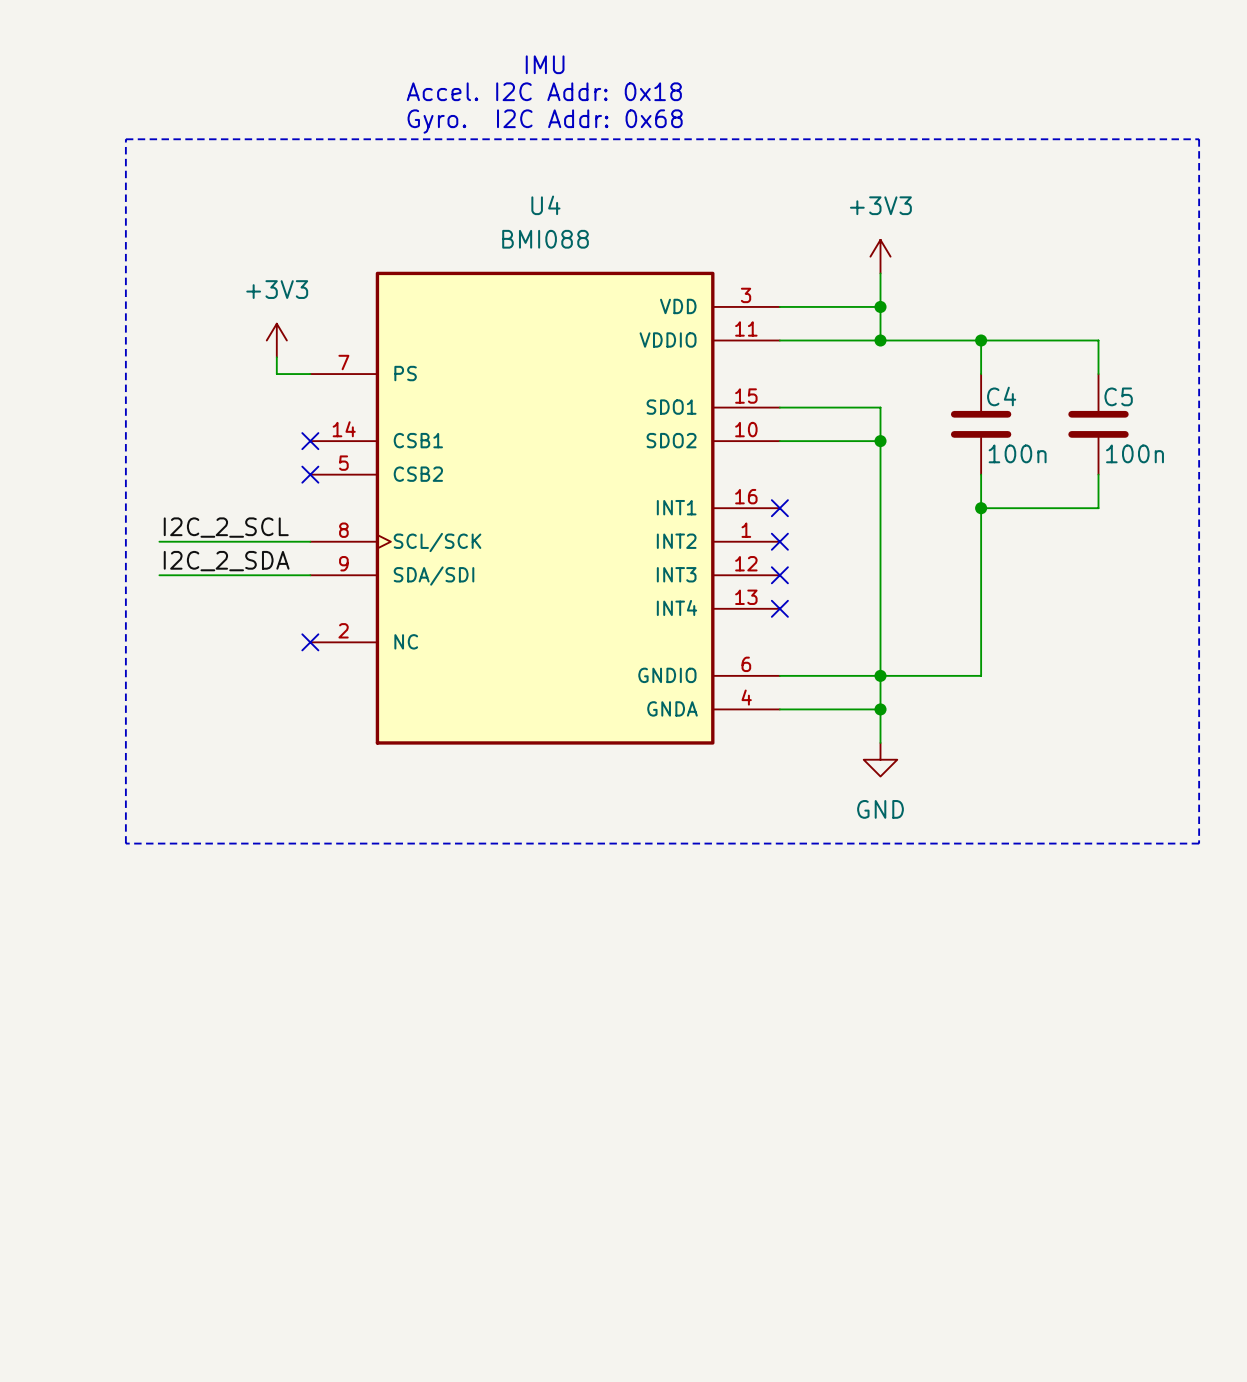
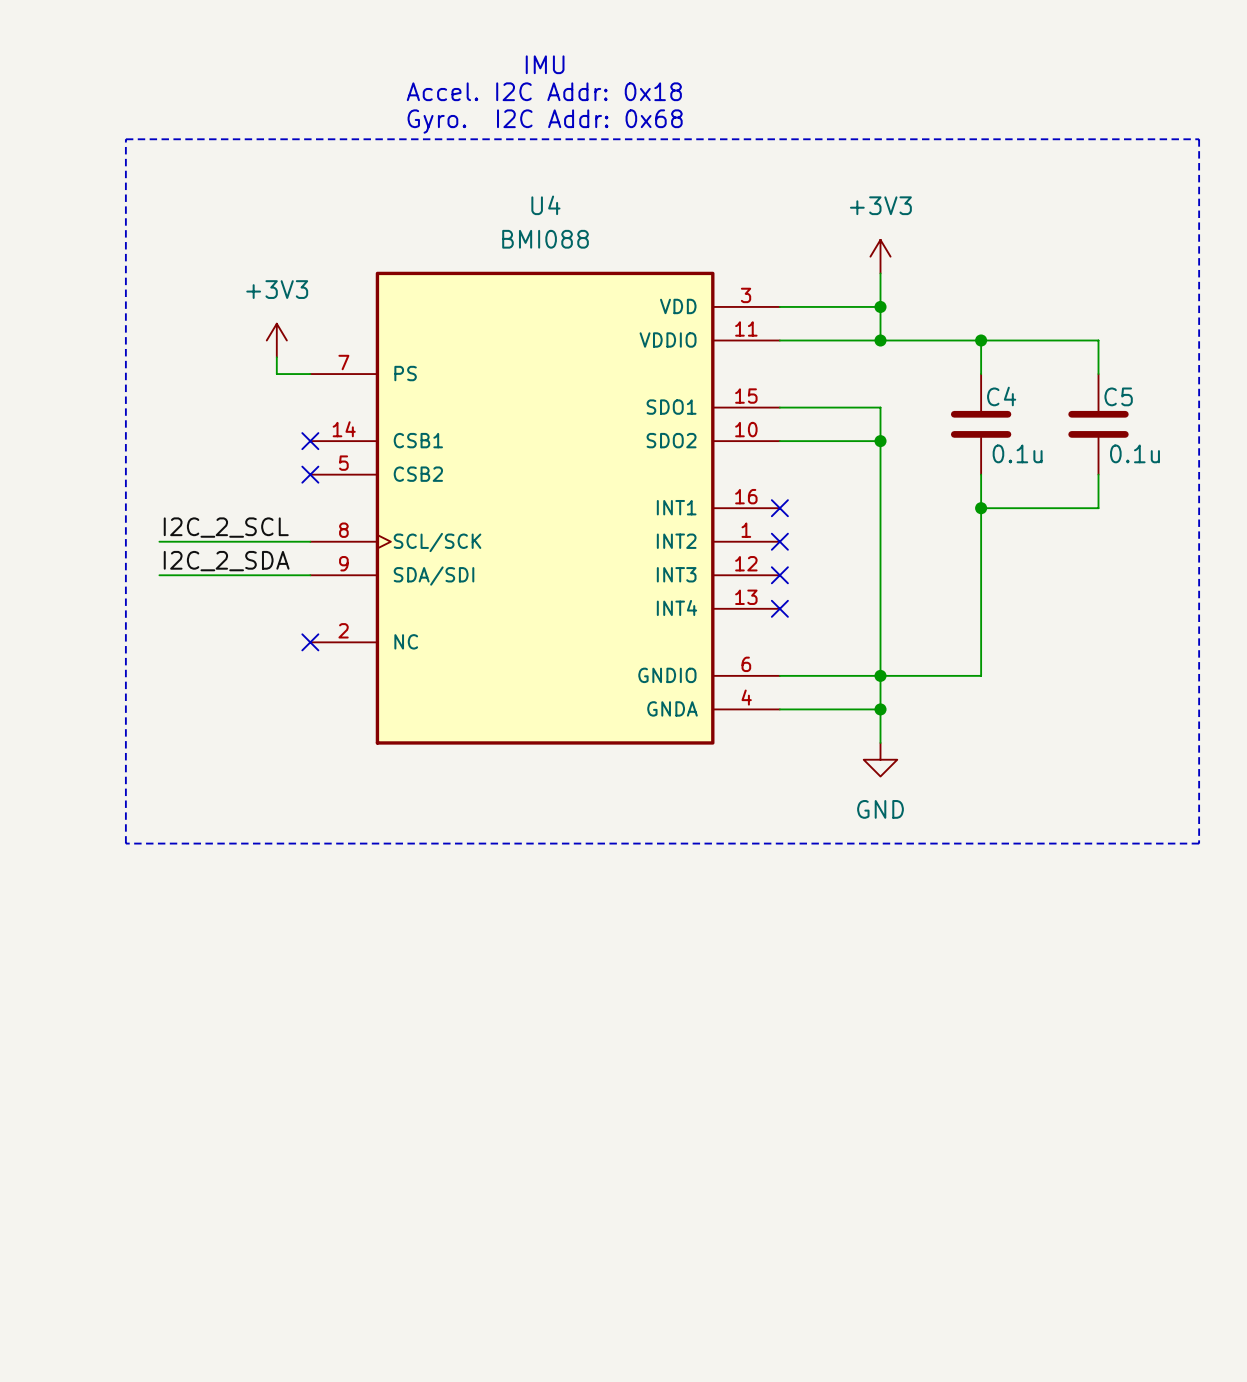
C4 value: 100n (1017, 453) -> 0.1u (1017, 453)
C5 value: 100n (1134, 453) -> 0.1u (1134, 453)

